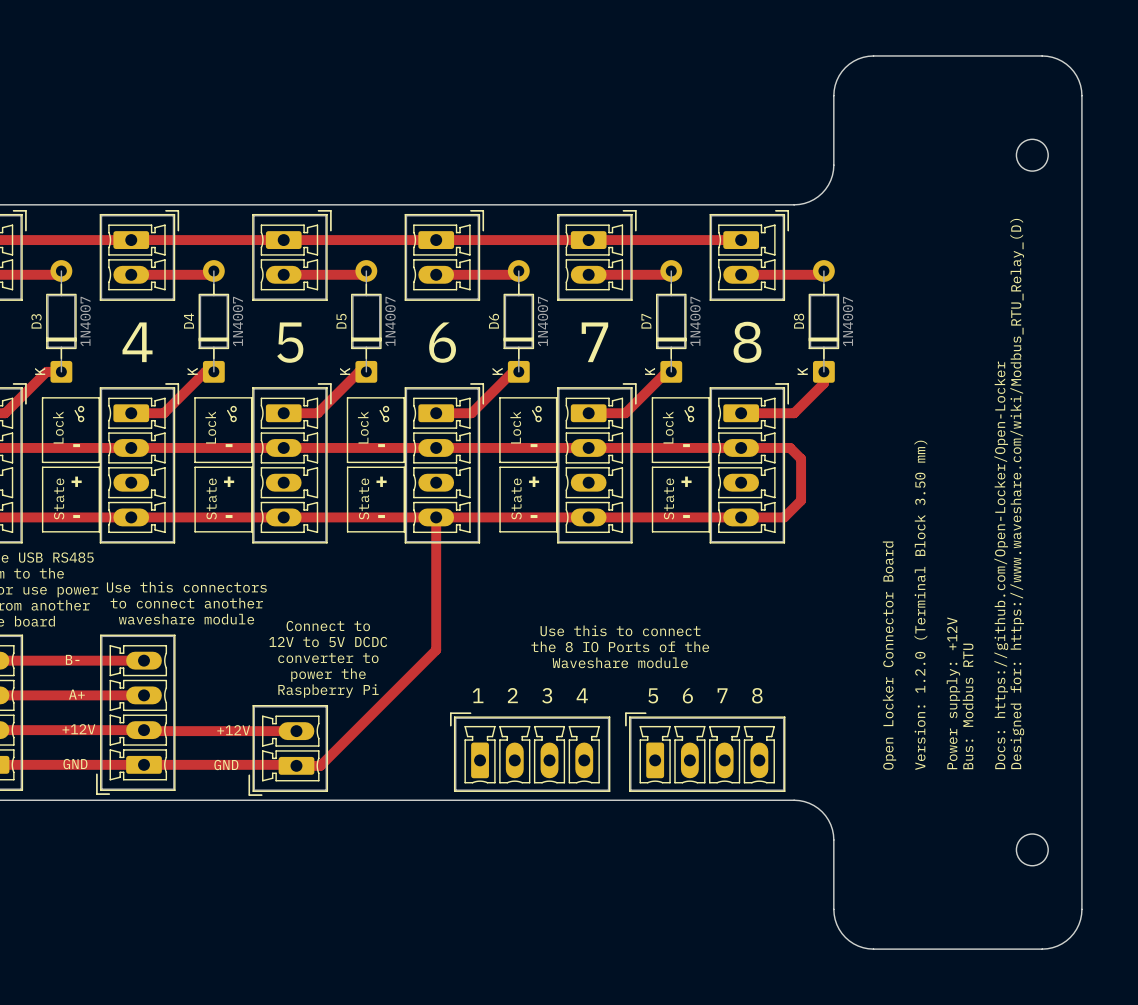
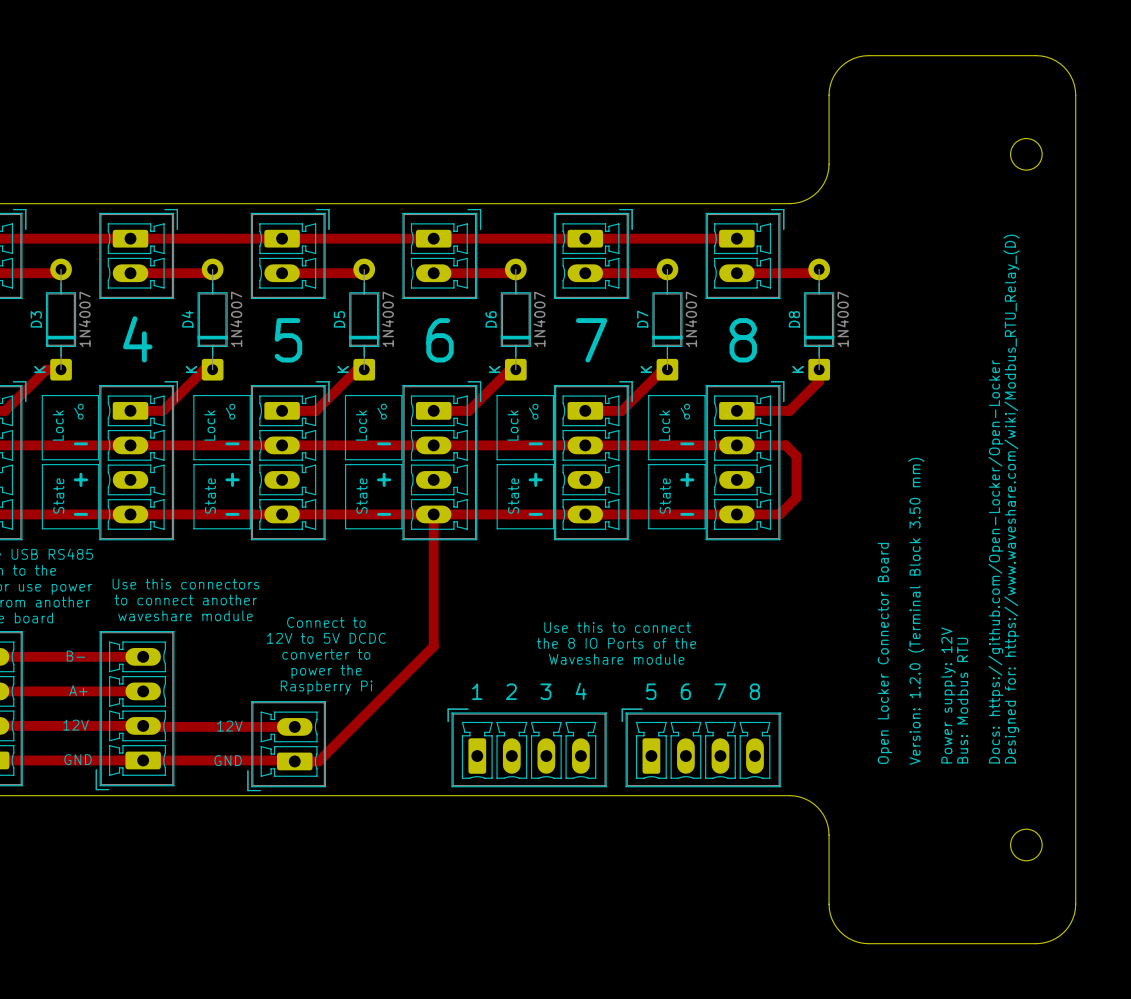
text: Power supply: +12V (953, 693) -> Power supply: 12V (948, 695)
text: +12V (78, 729) -> 12V (76, 725)
text: +12V (233, 730) -> 12V (229, 726)

